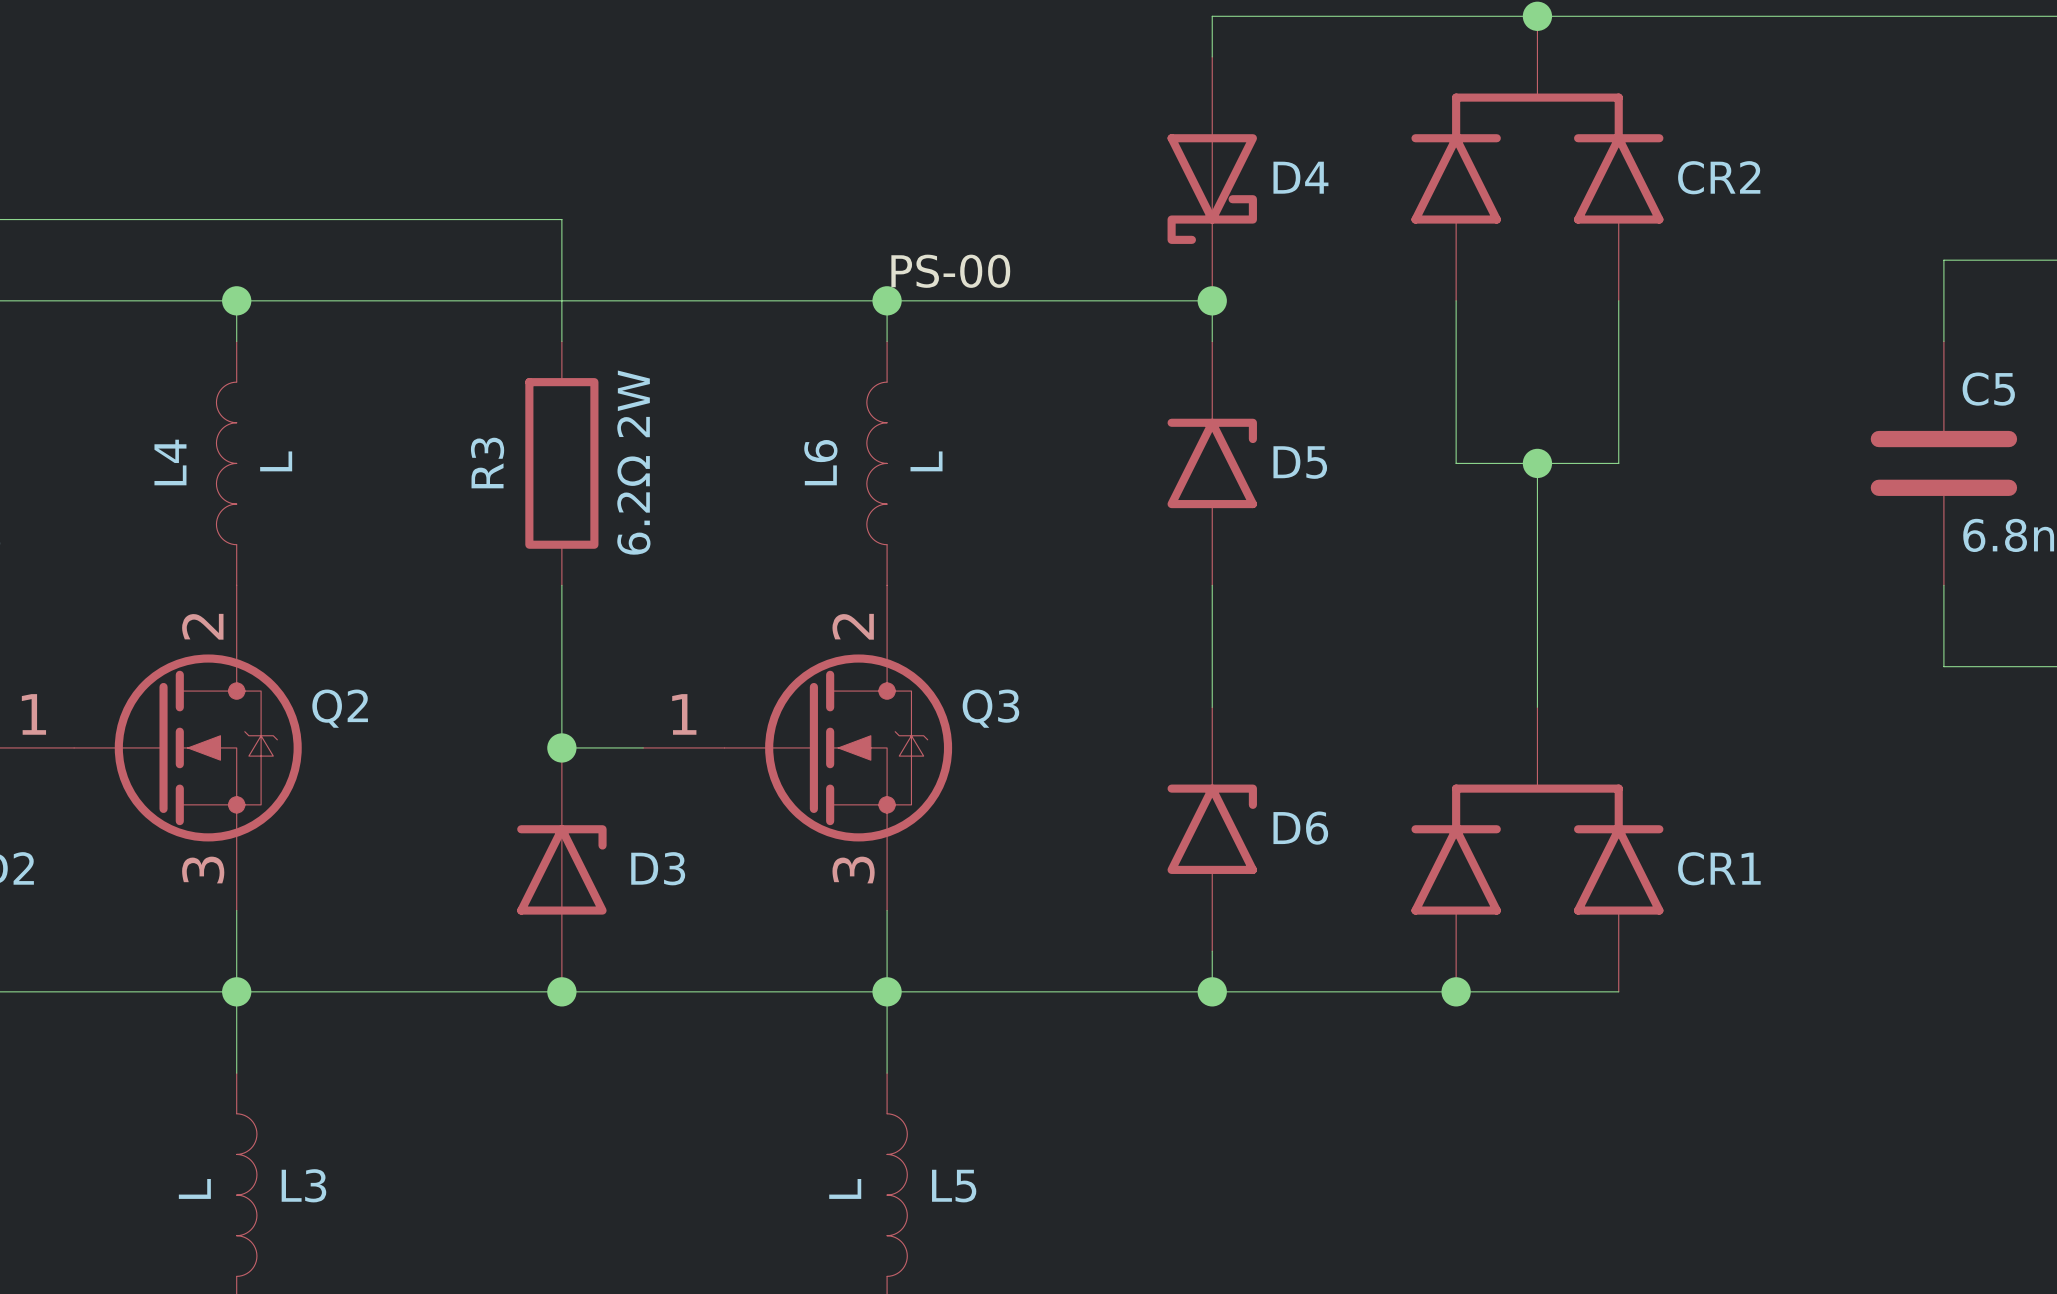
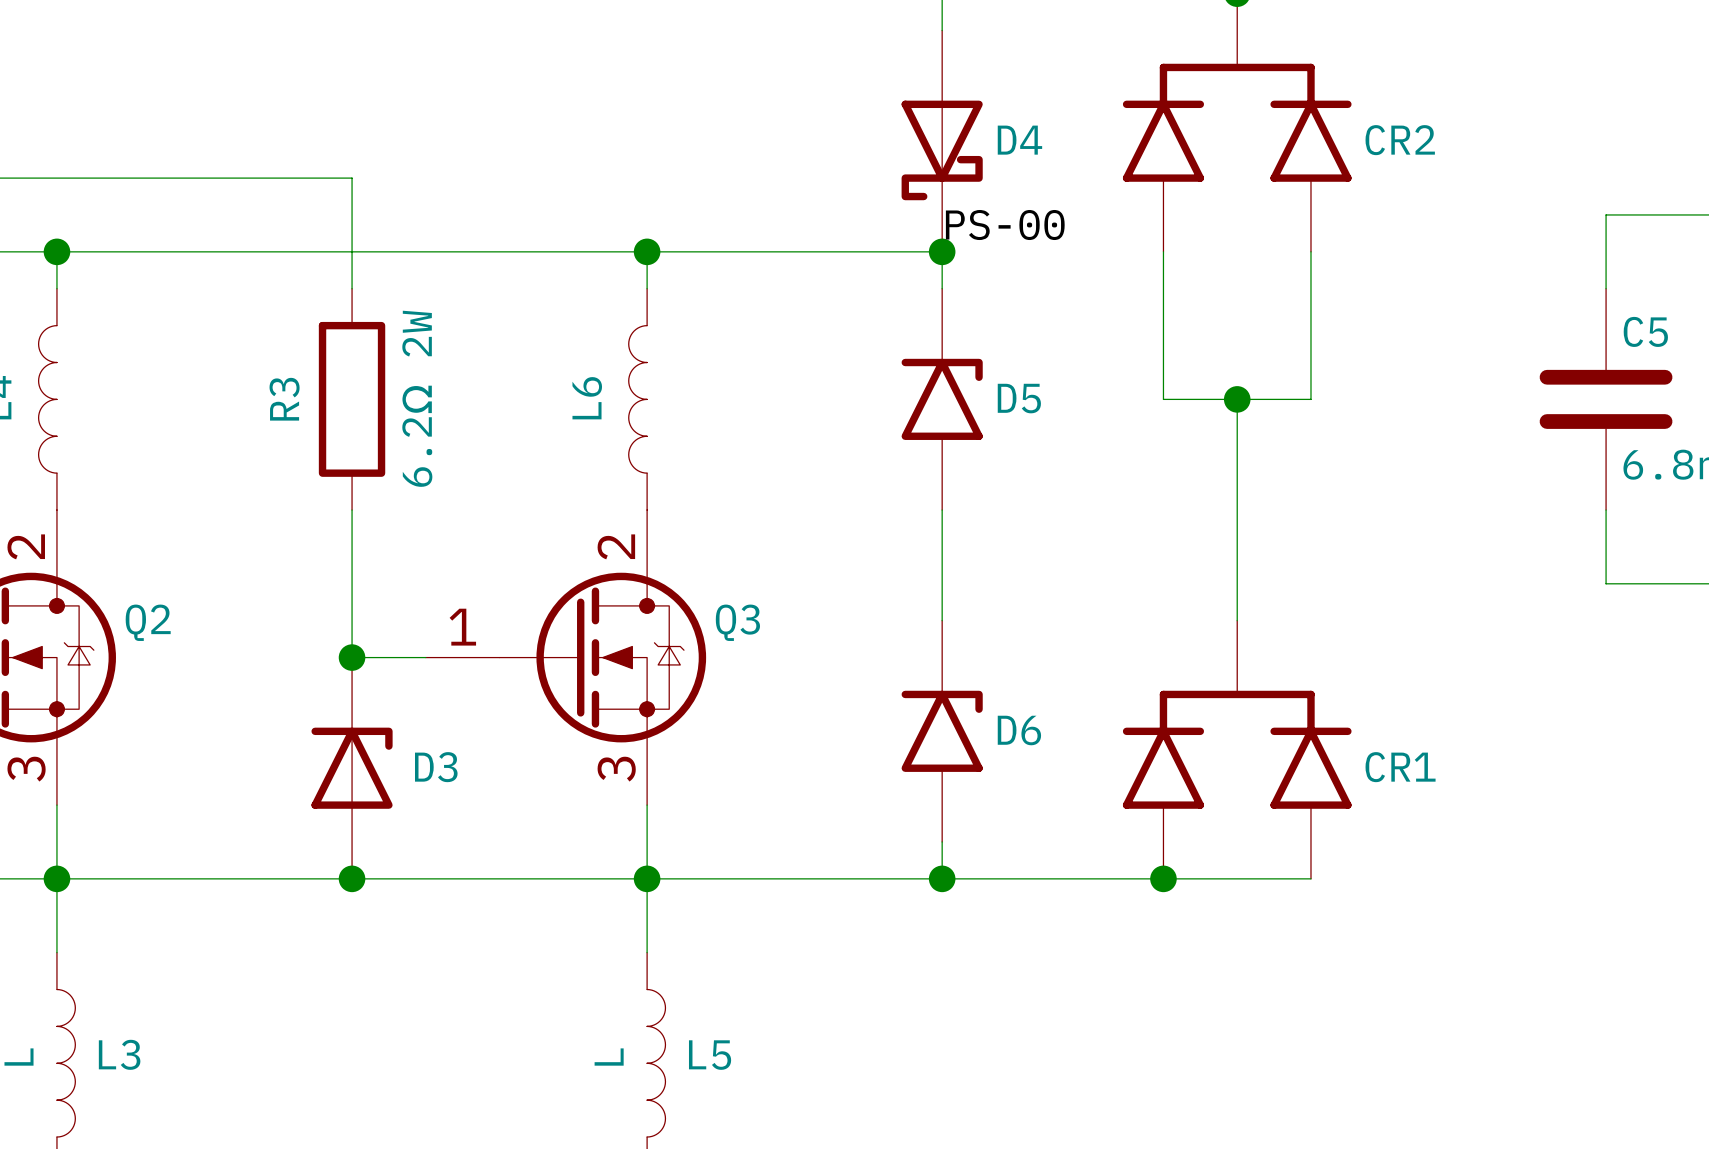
label position: PS-00 (950, 271) -> PS-00 (1005, 225)
L4 value: L (276, 461) -> none
L6 value: L (926, 461) -> none

